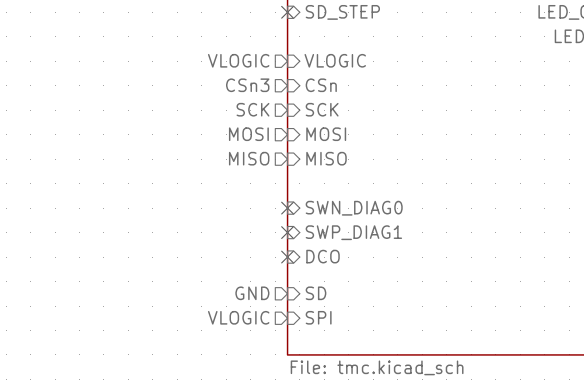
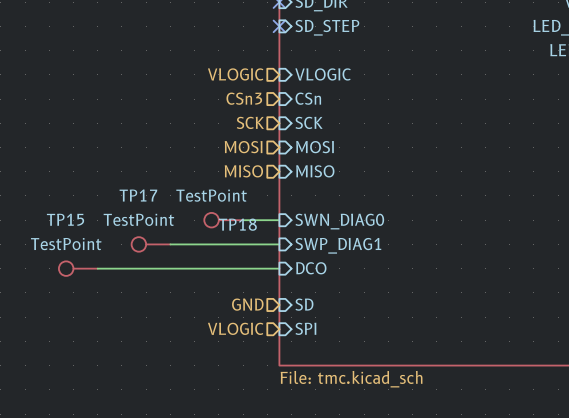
TP18: none -> TestPoint (223, 220)
wire: none -> (243, 220) (279, 220)
no-connect mark: (287, 208) -> none
TP17: none -> TestPoint (150, 244)
wire: none -> (170, 244) (279, 244)
no-connect mark: (287, 232) -> none
TP15: none -> TestPoint (78, 268)
wire: none -> (97, 268) (279, 268)
no-connect mark: (287, 257) -> none

